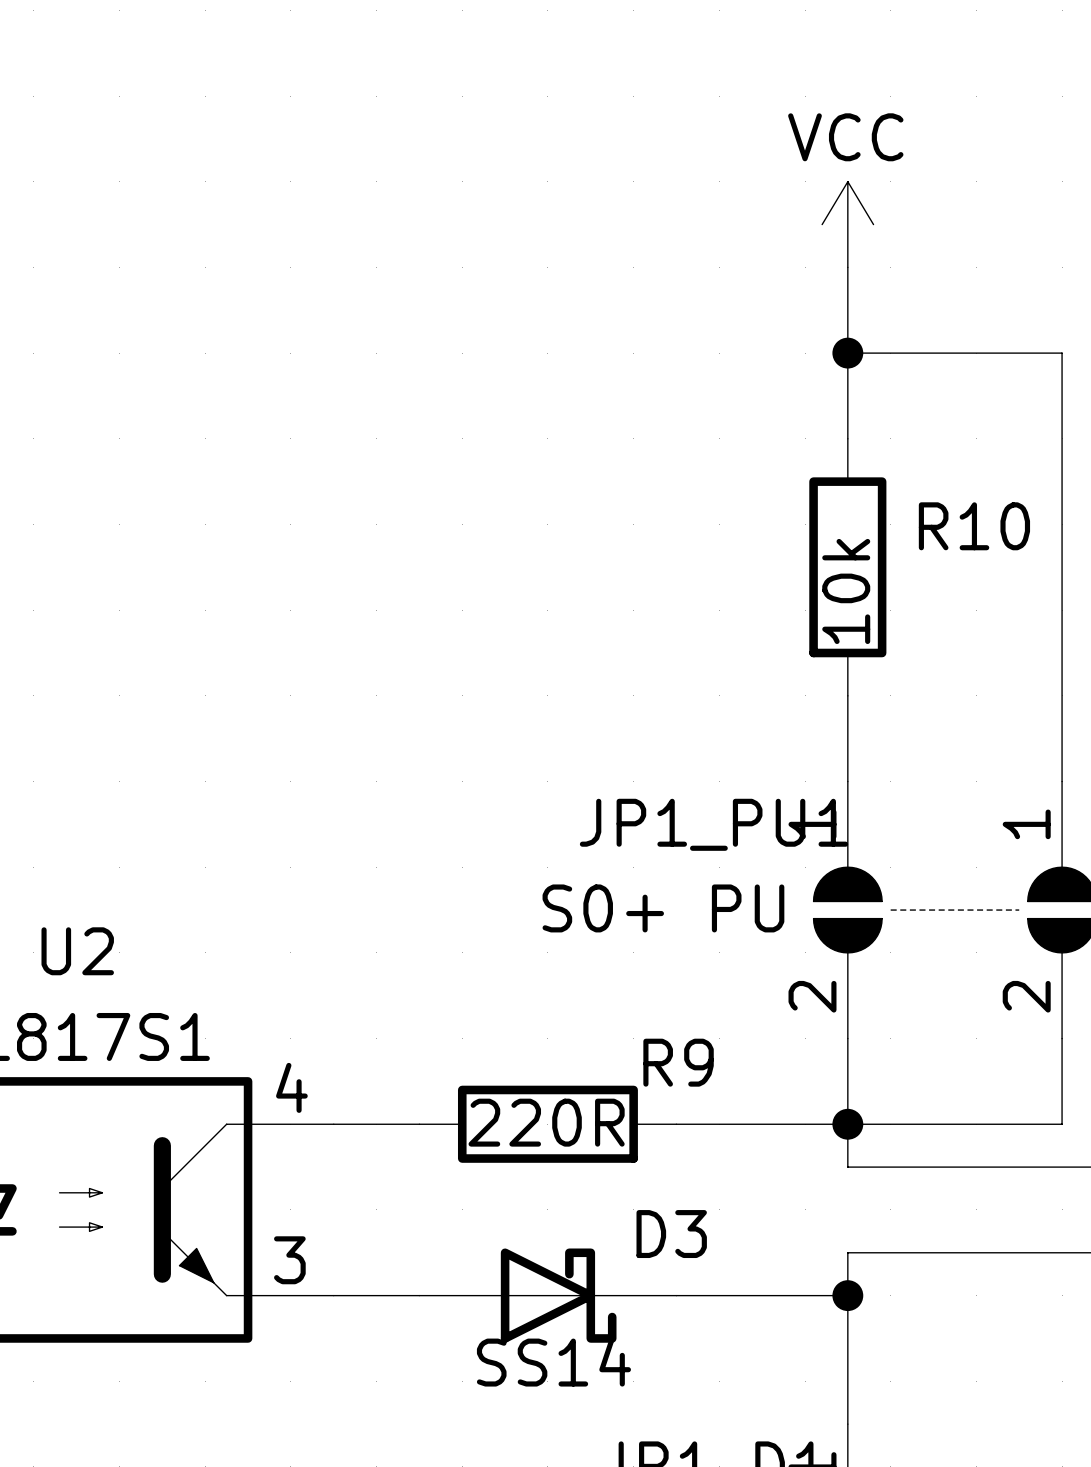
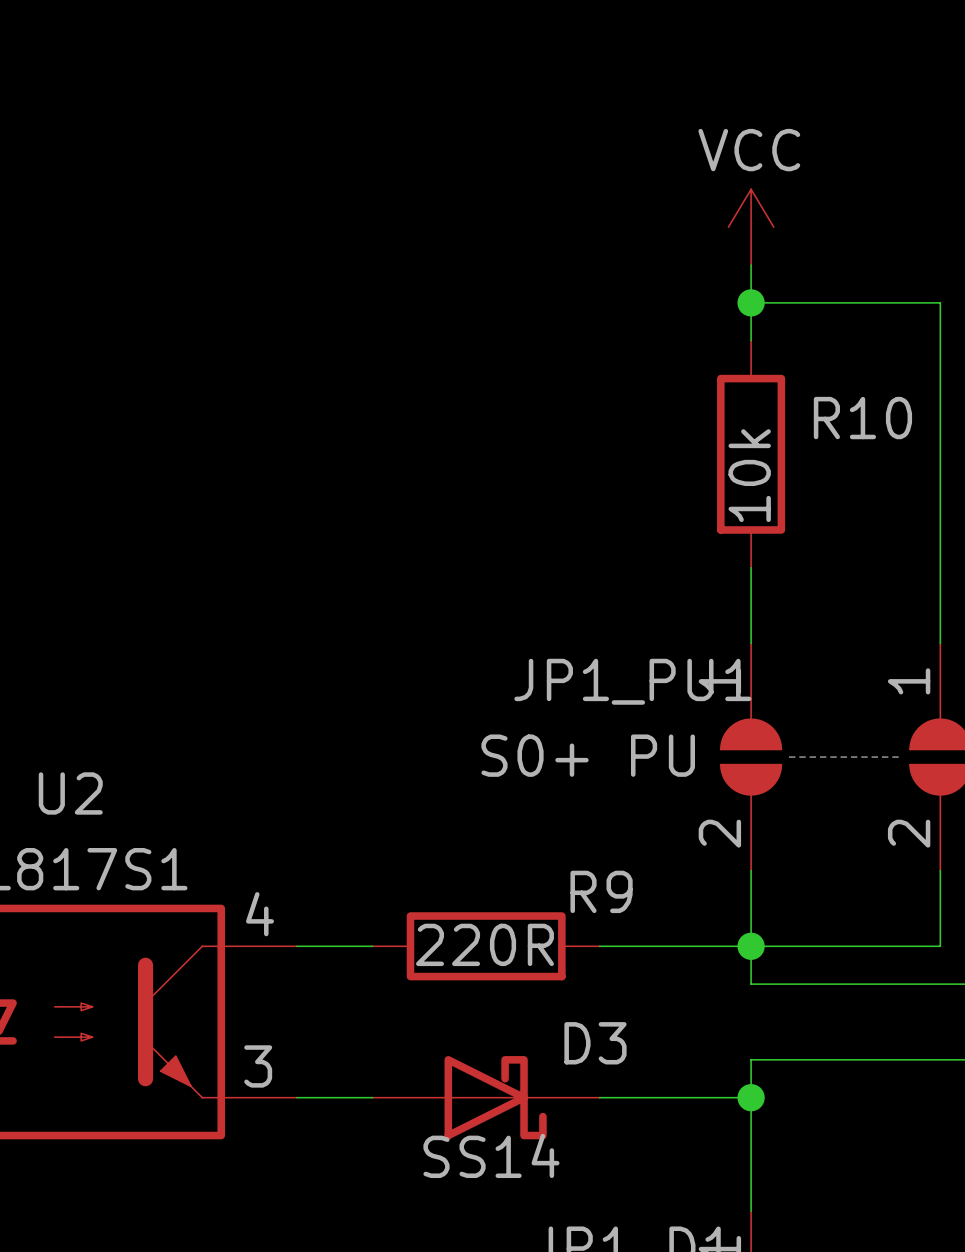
power symbol position: VCC (847, 224) -> VCC (751, 227)
wire: (847, 267) (847, 353) (1062, 353) (1062, 395) -> (751, 302) (940, 302)
junction position: (847, 353) -> (751, 302)

